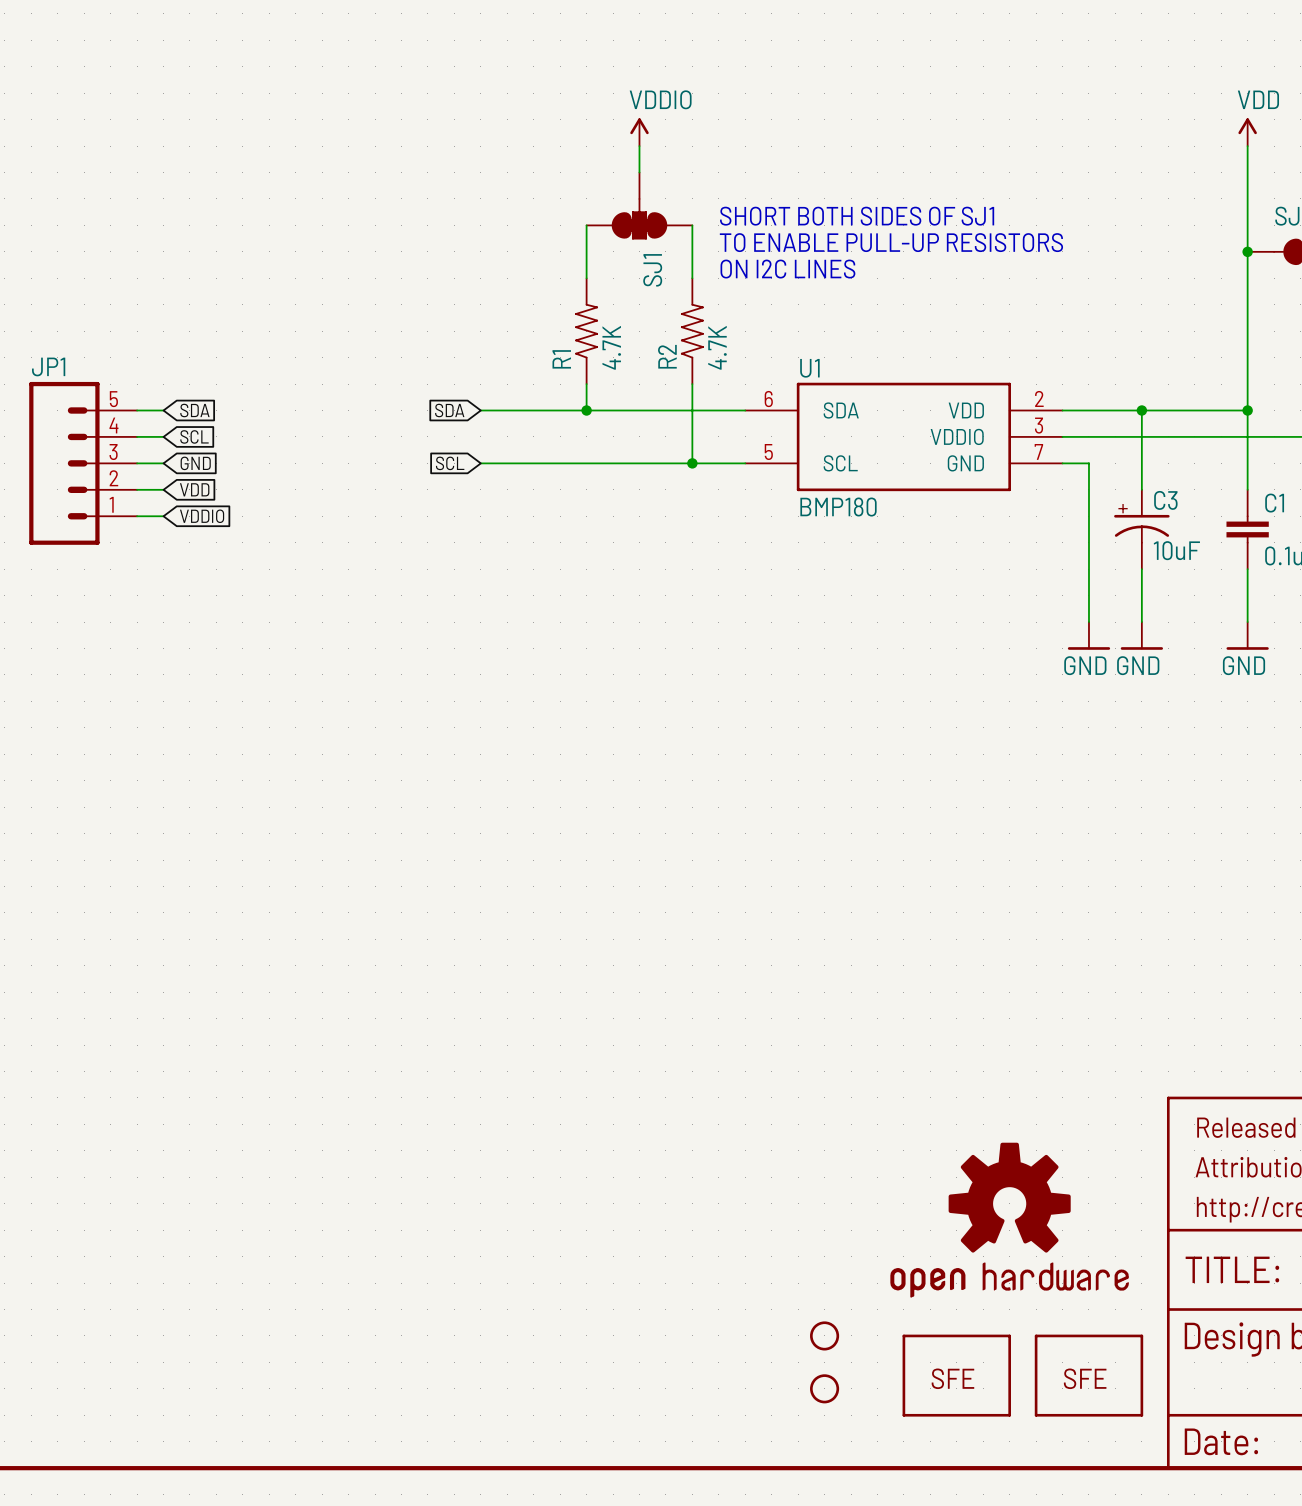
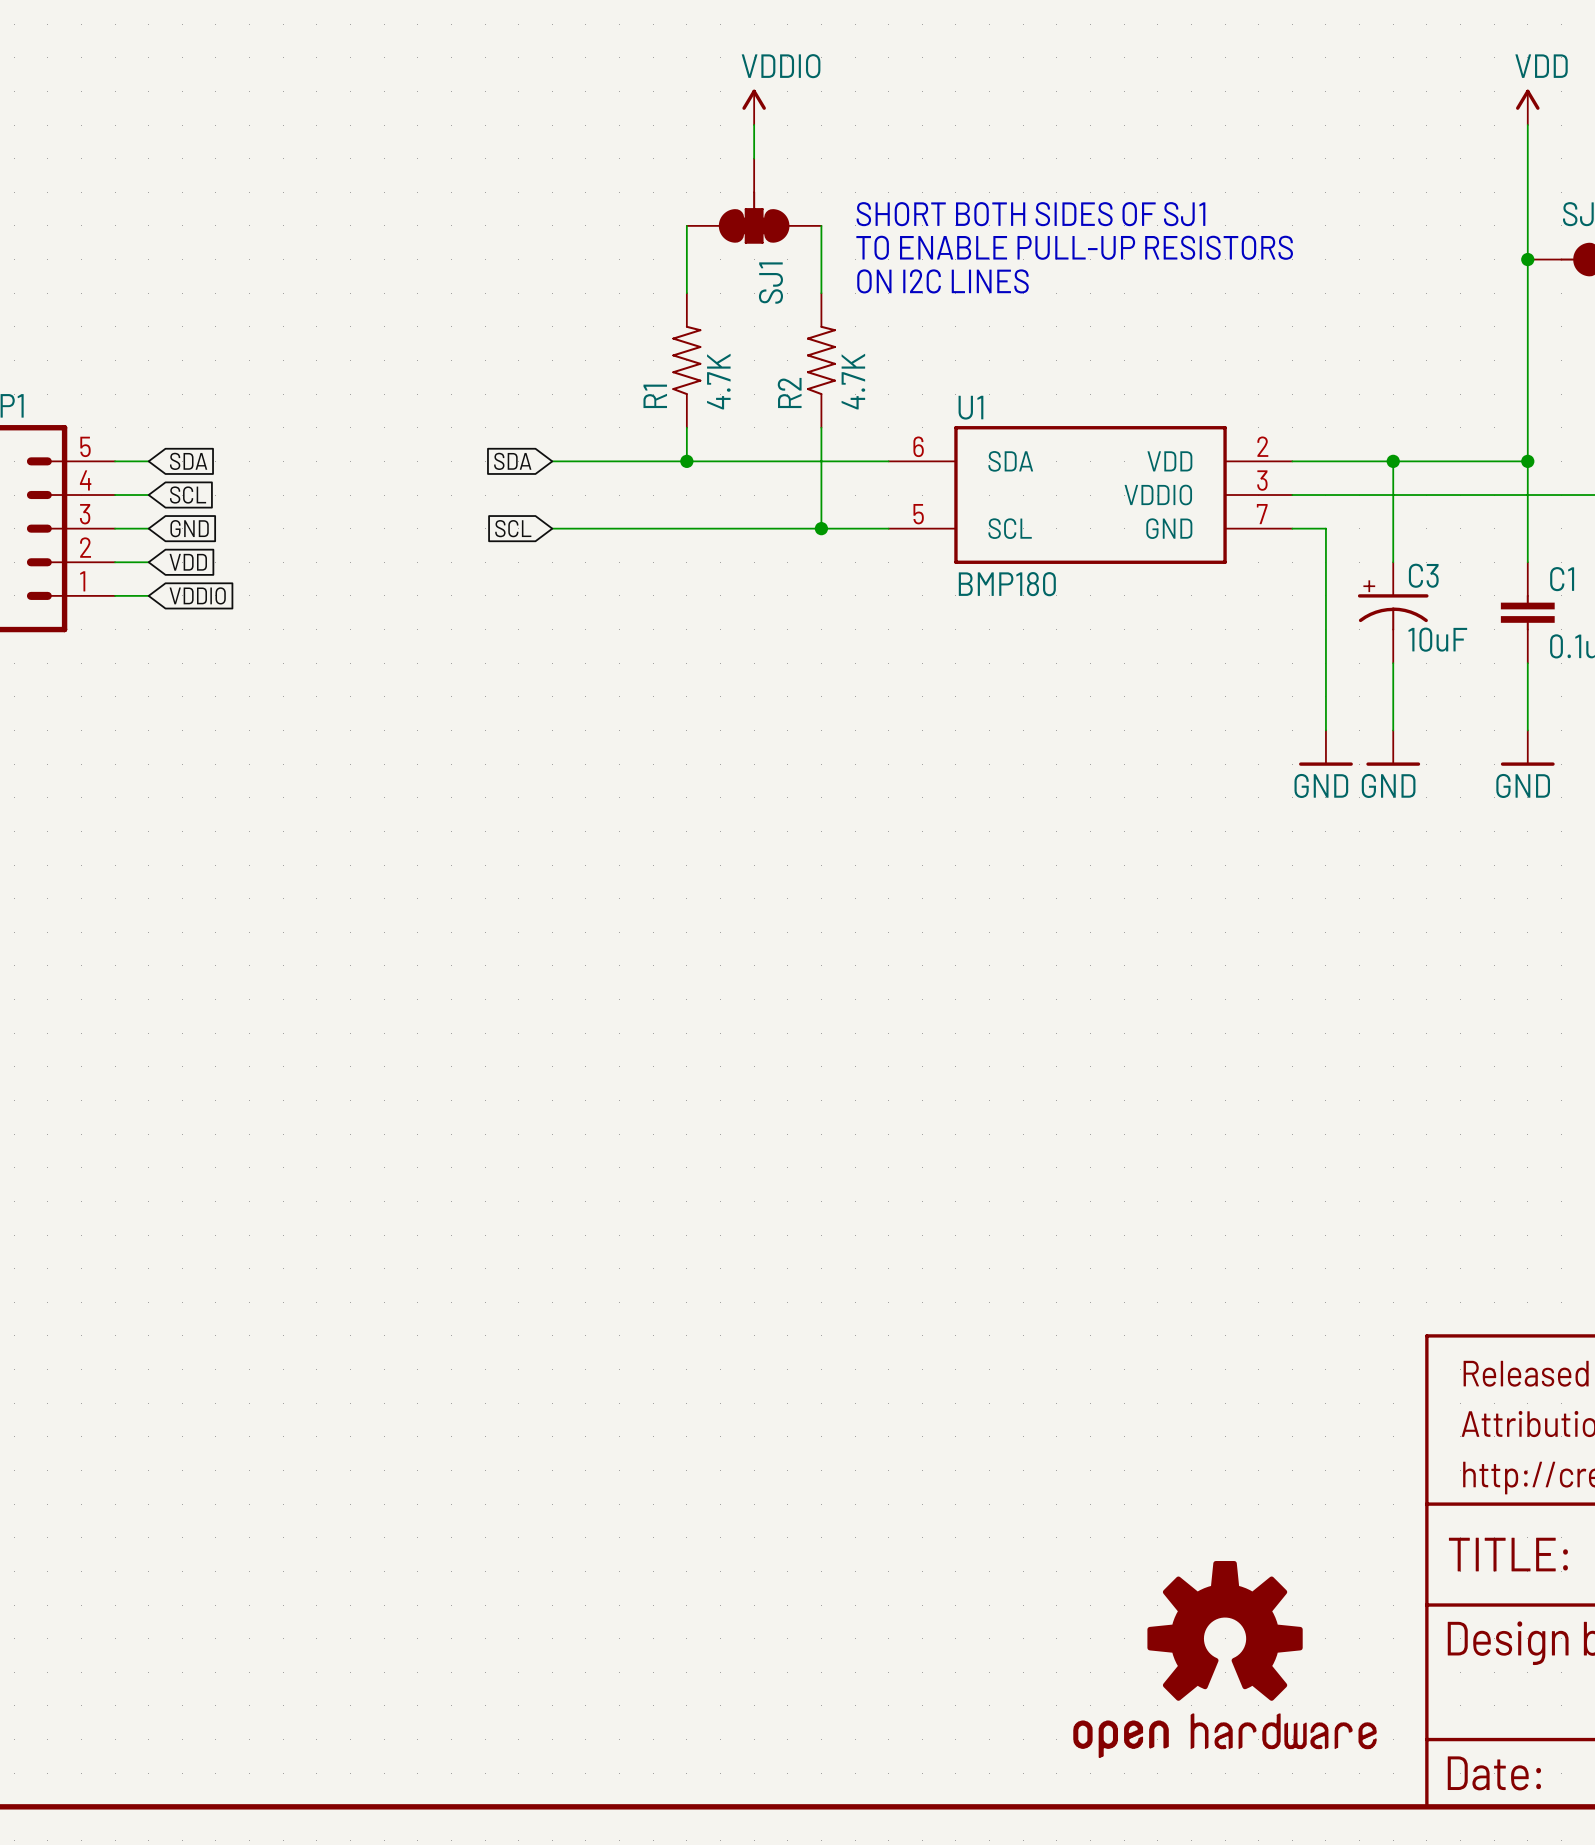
part position: (1009, 1220) -> (1224, 1659)
part: (824, 1335) -> none
part: (956, 1375) -> none
part: (1088, 1375) -> none
part: (824, 1388) -> none

